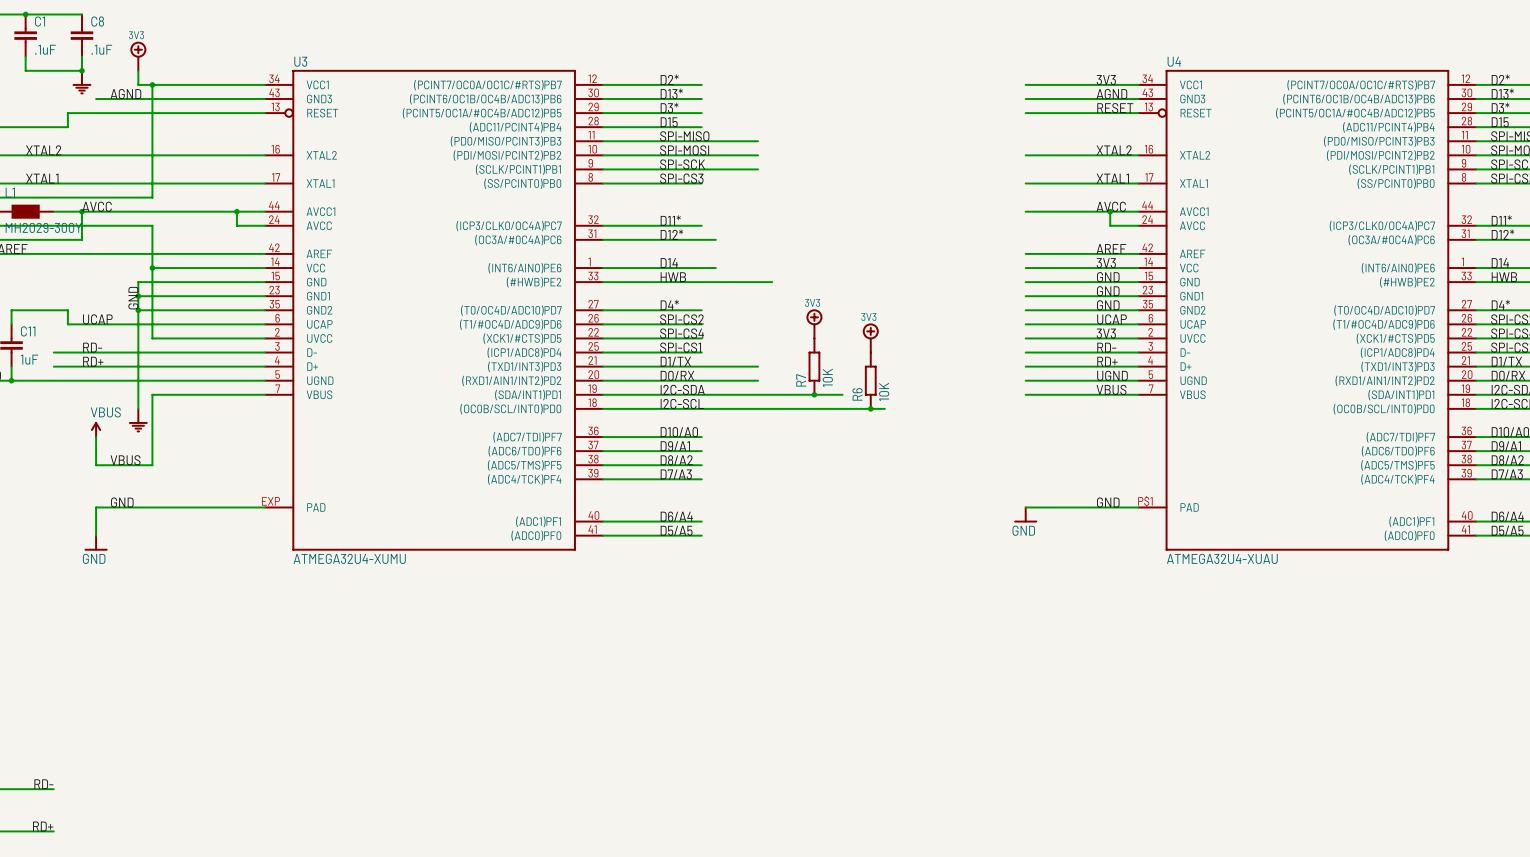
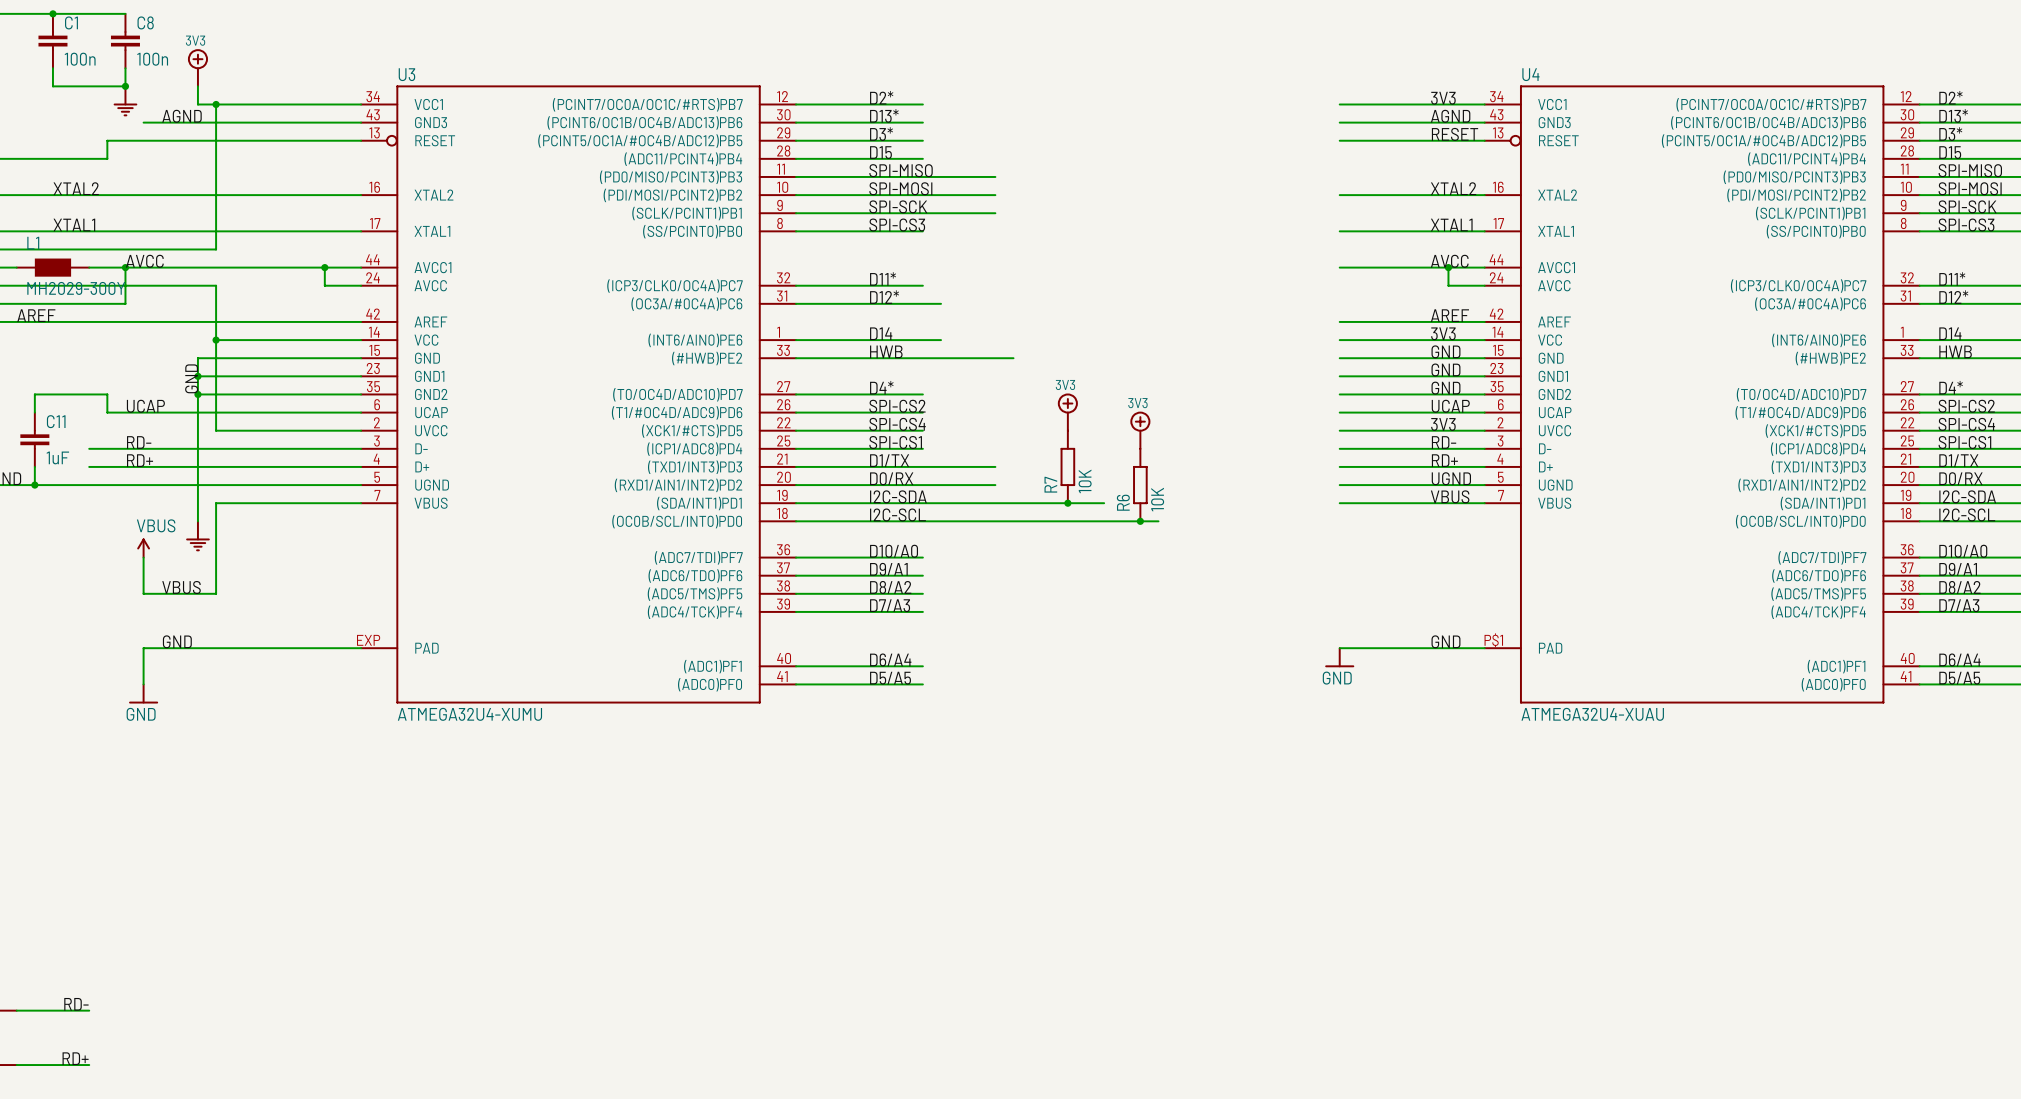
C1 value: .1uF (45, 49) -> 100n (80, 59)
C8 value: .1uF (101, 49) -> 100n (152, 59)

